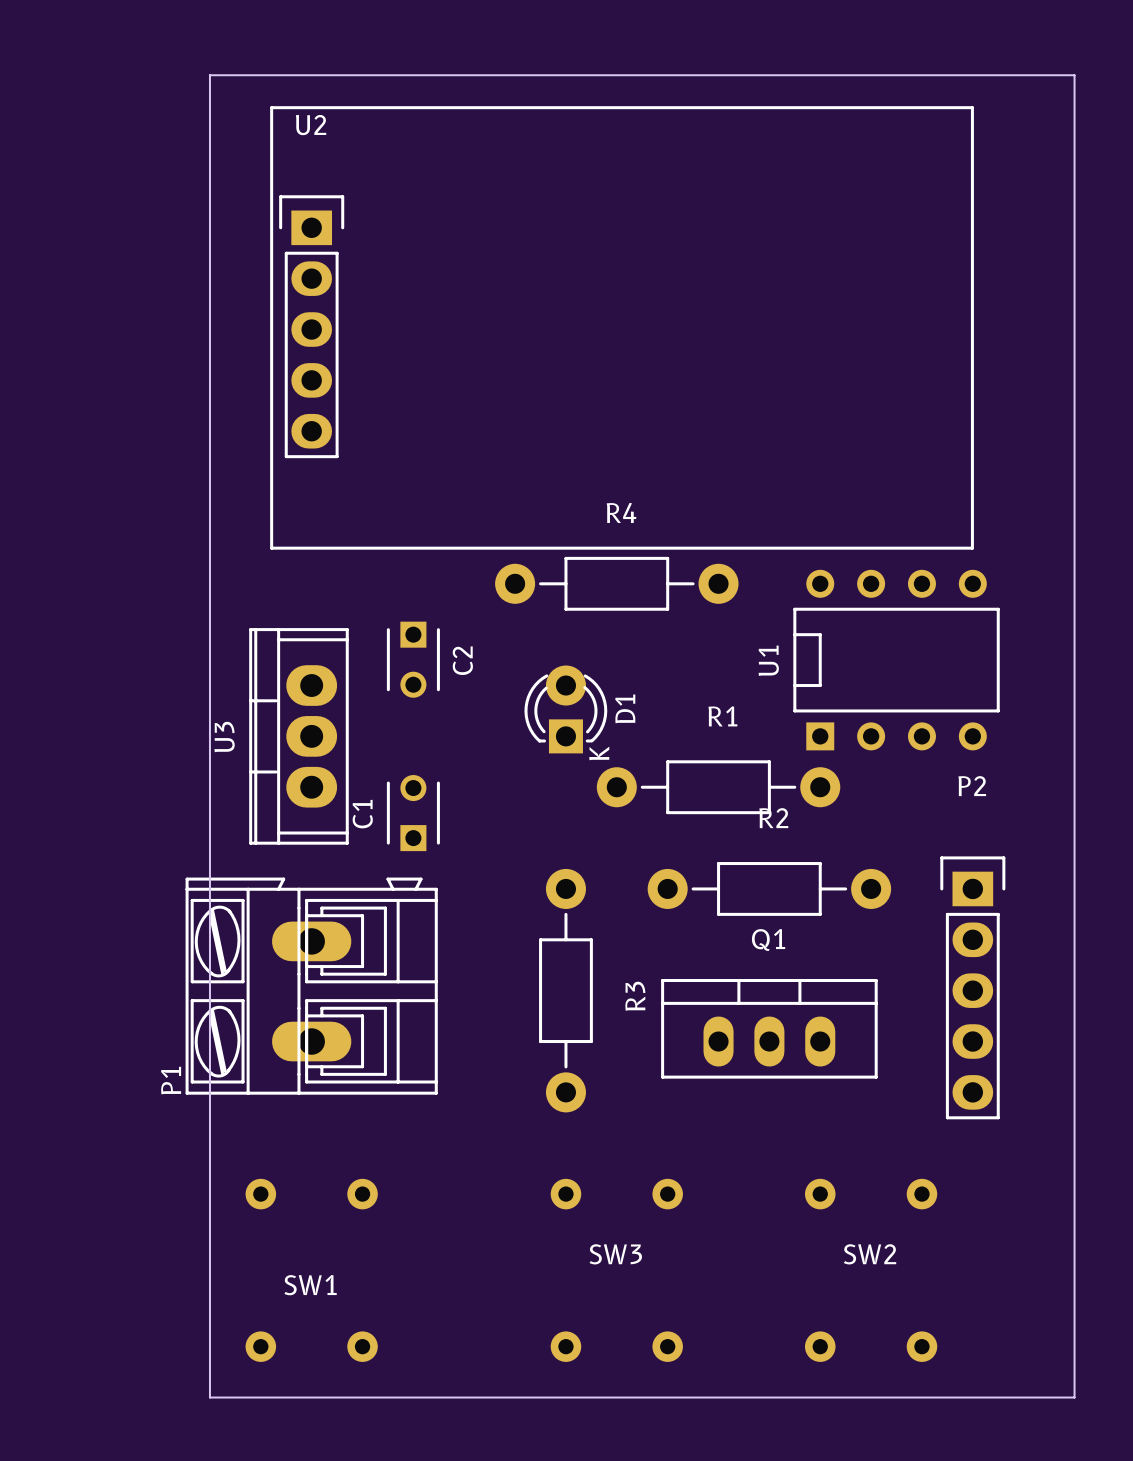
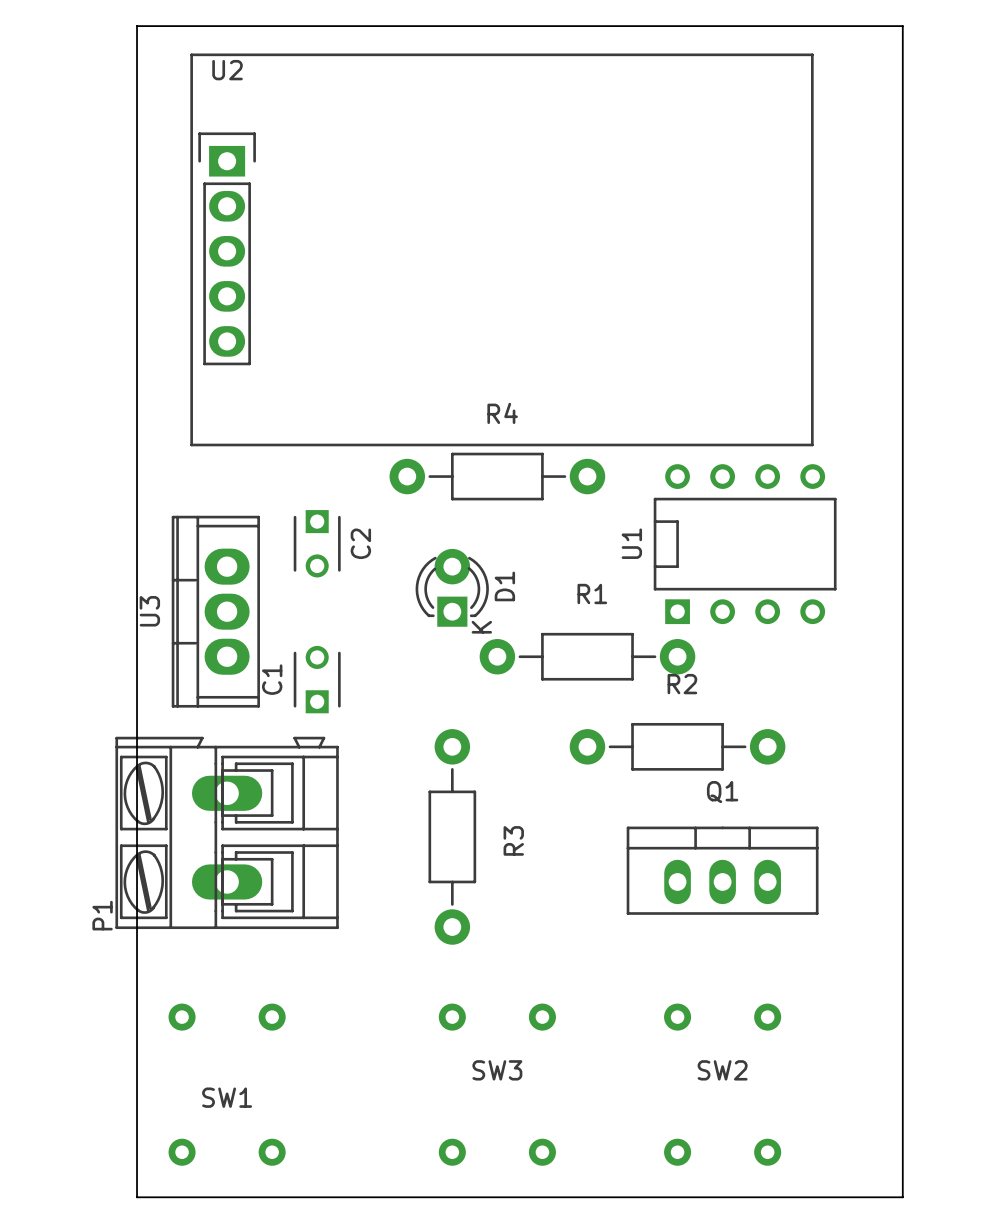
R2 position: (769, 888) -> (677, 746)
P2: (972, 987) -> none
Q1 position: (769, 1028) -> (722, 870)

